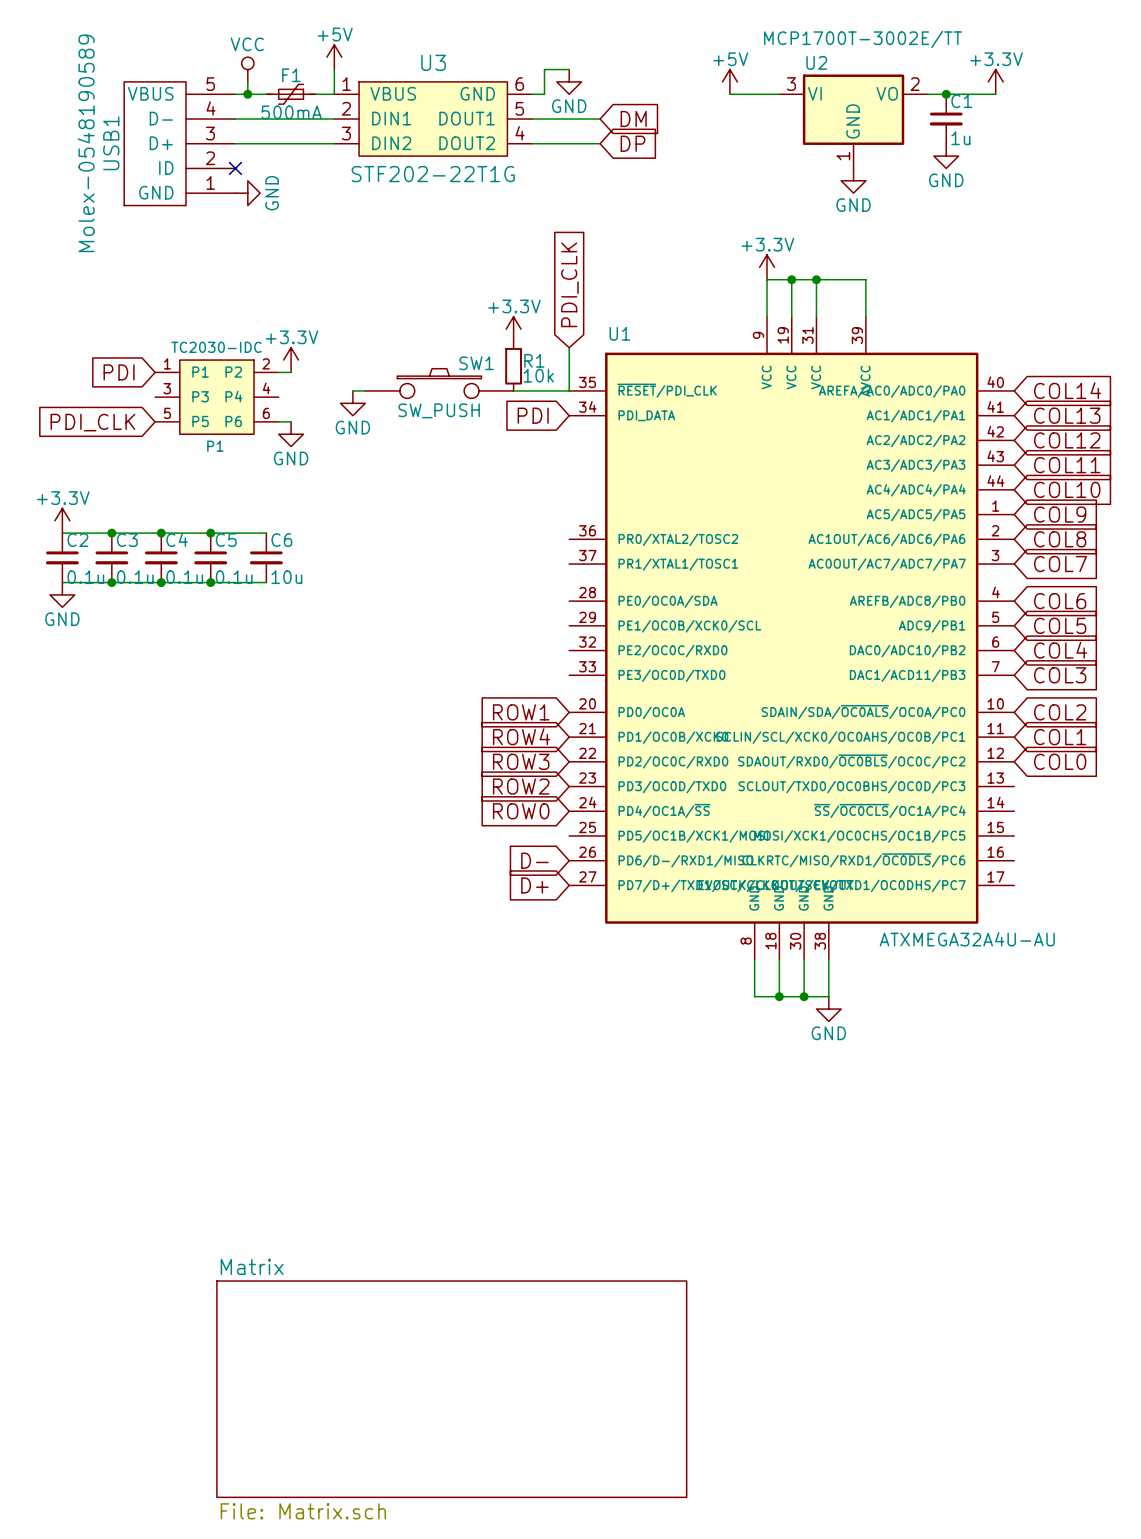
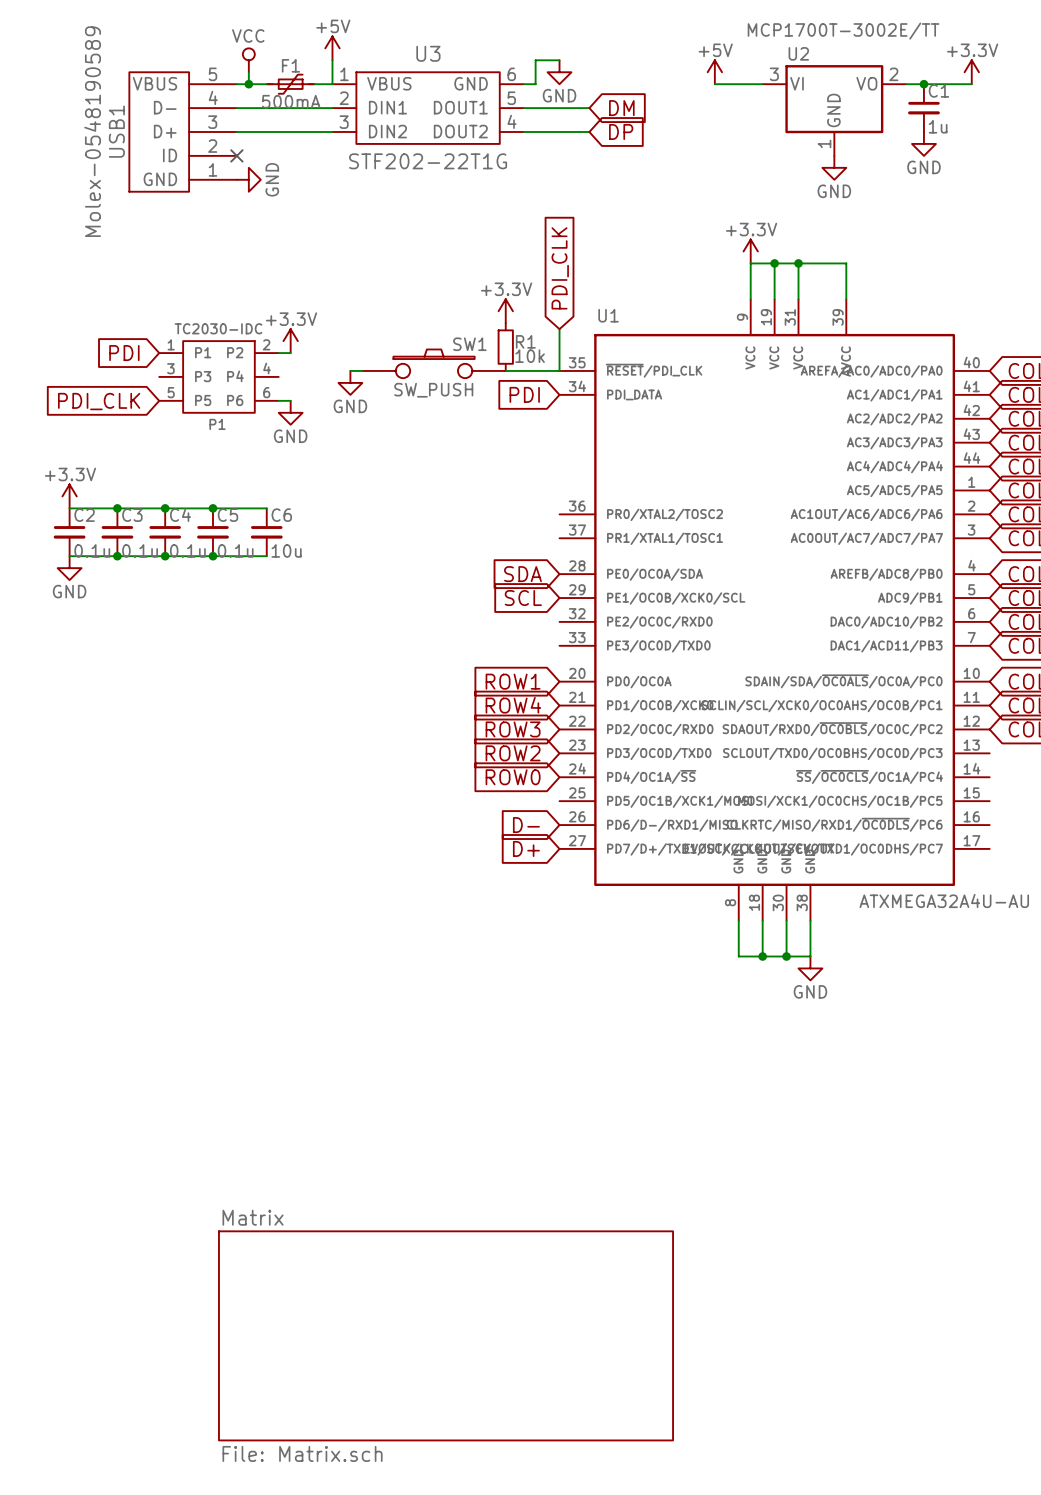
global label: none -> SDA (522, 574)
global label: none -> SCL (523, 598)

